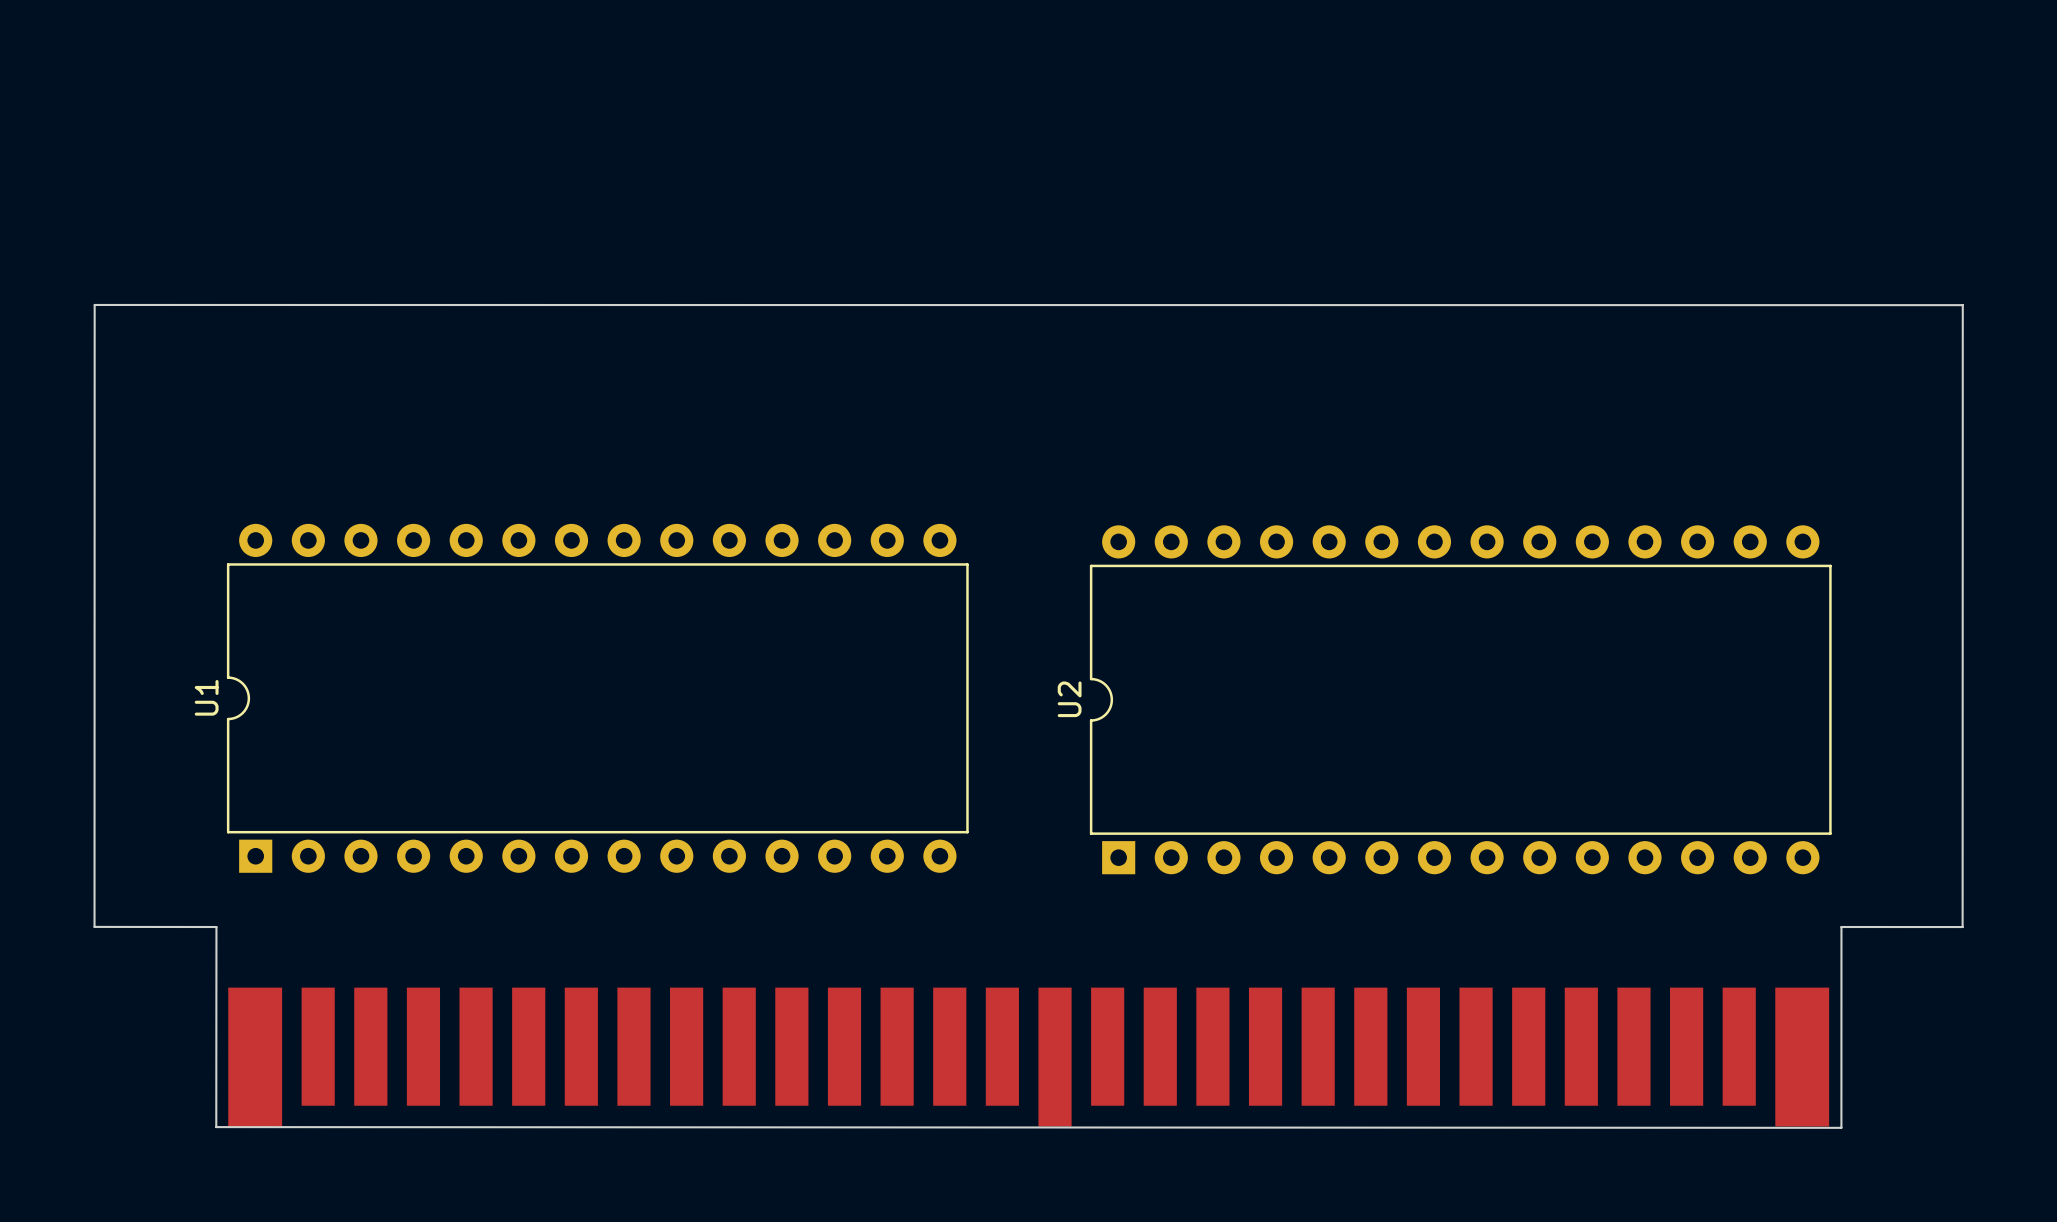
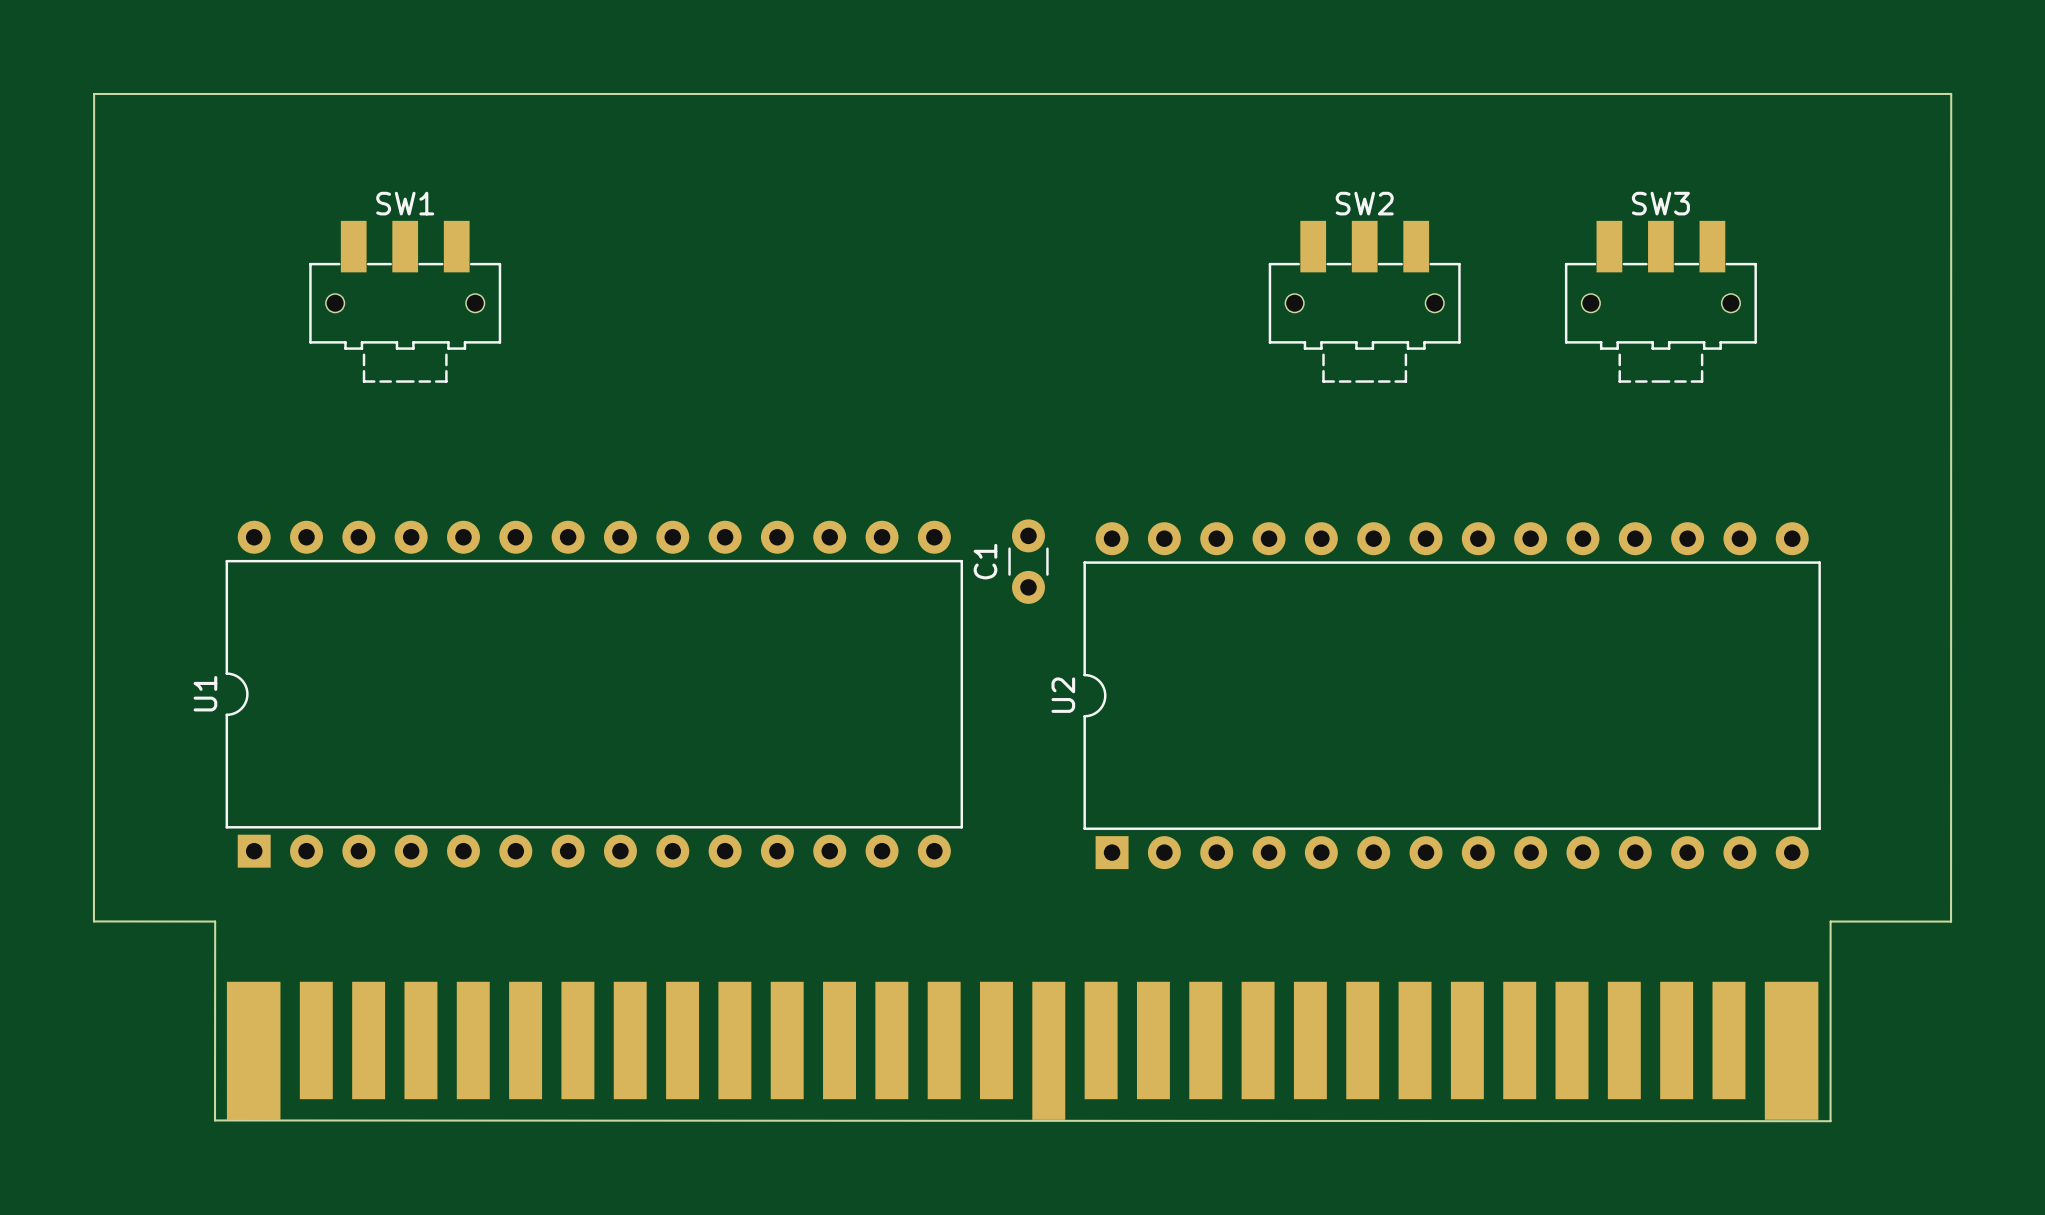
SW1: none -> (405, 301)
SW2: none -> (1364, 301)
SW3: none -> (1660, 301)
C1: none -> (1028, 561)
board edge: (94, 926) (94, 304) (1962, 305) (1962, 927) -> (93, 921) (94, 93) (1951, 93) (1951, 921)

